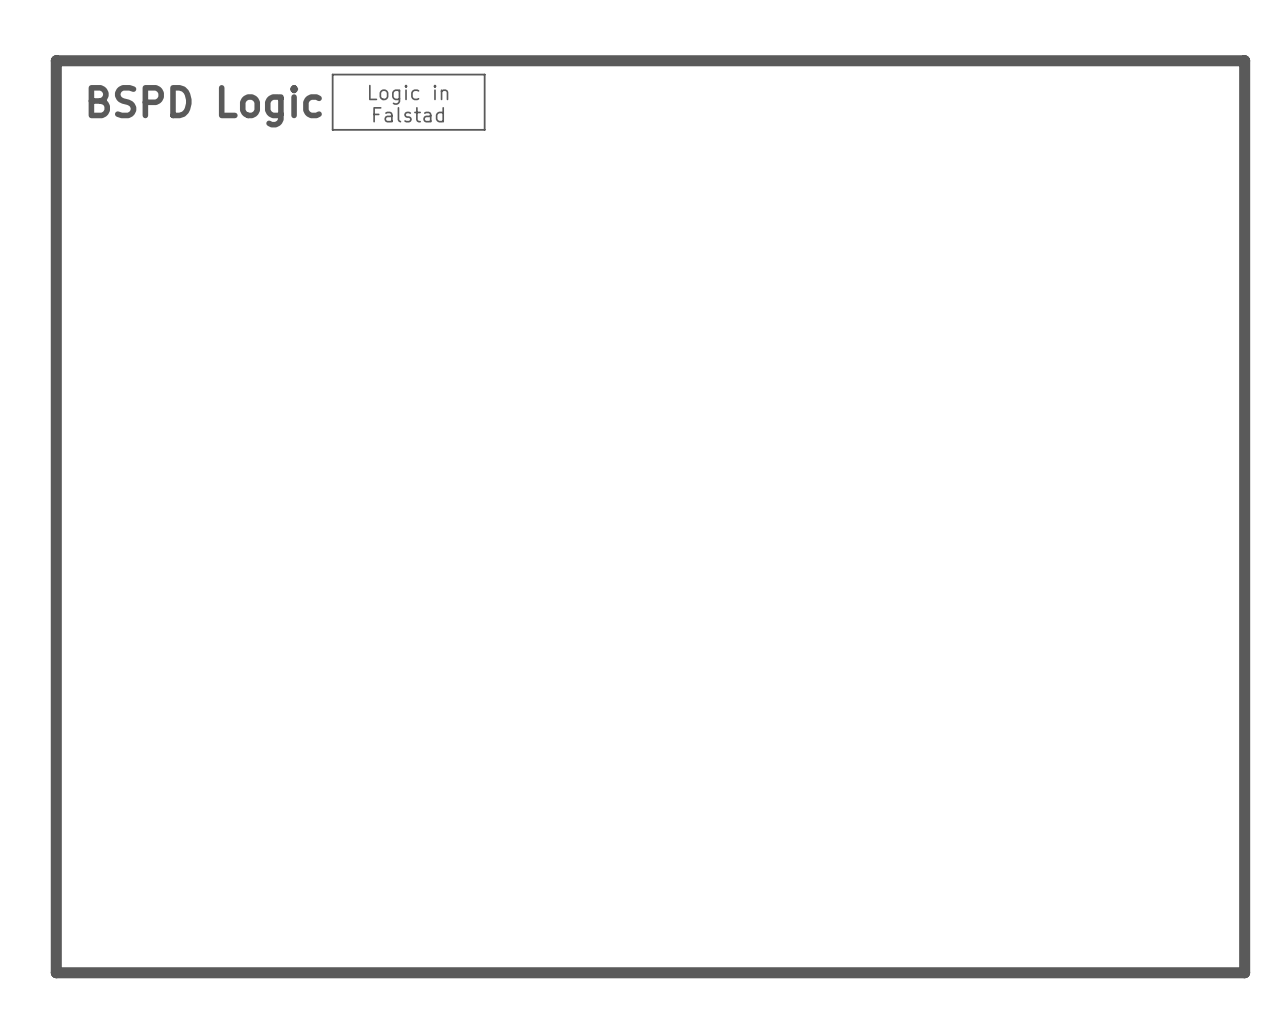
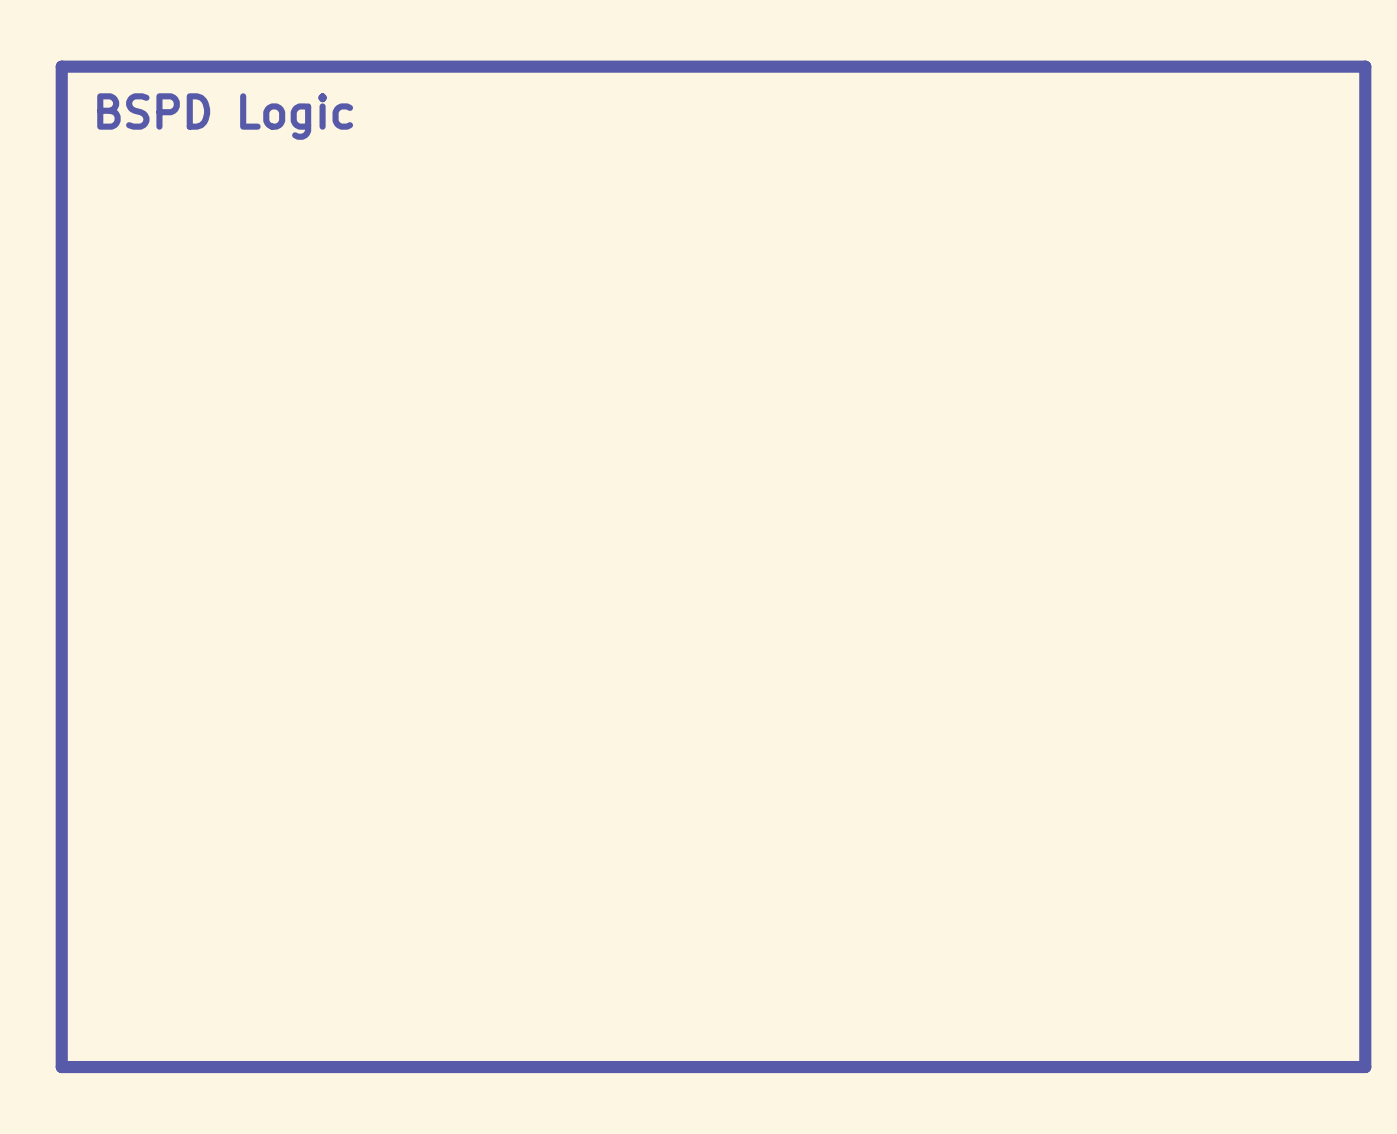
line: (332, 74) (484, 74) (484, 129) (332, 129) (332, 74) -> none
text: Logic in (408, 94) -> none
text: Falstad (408, 114) -> none

